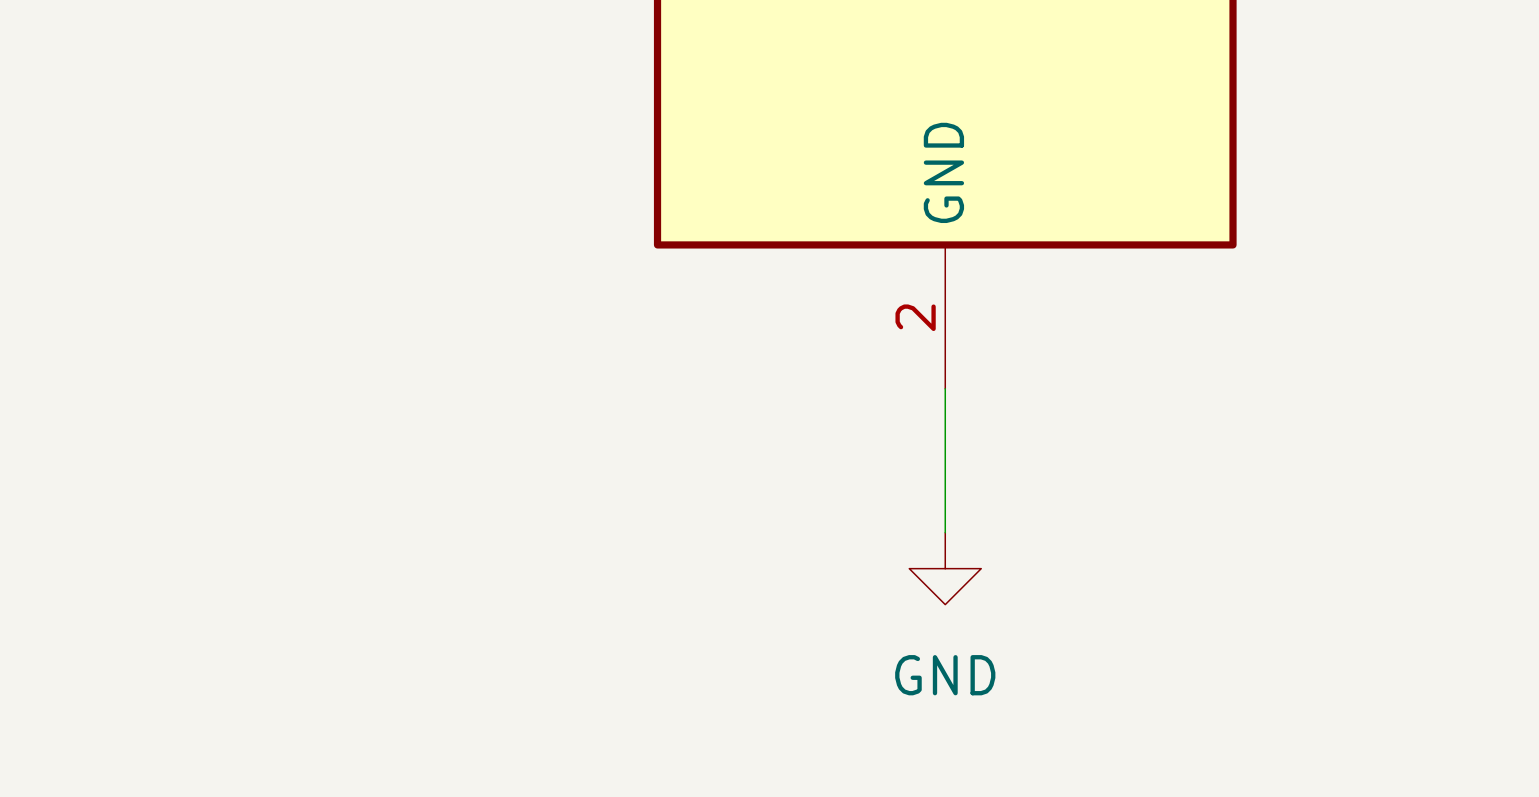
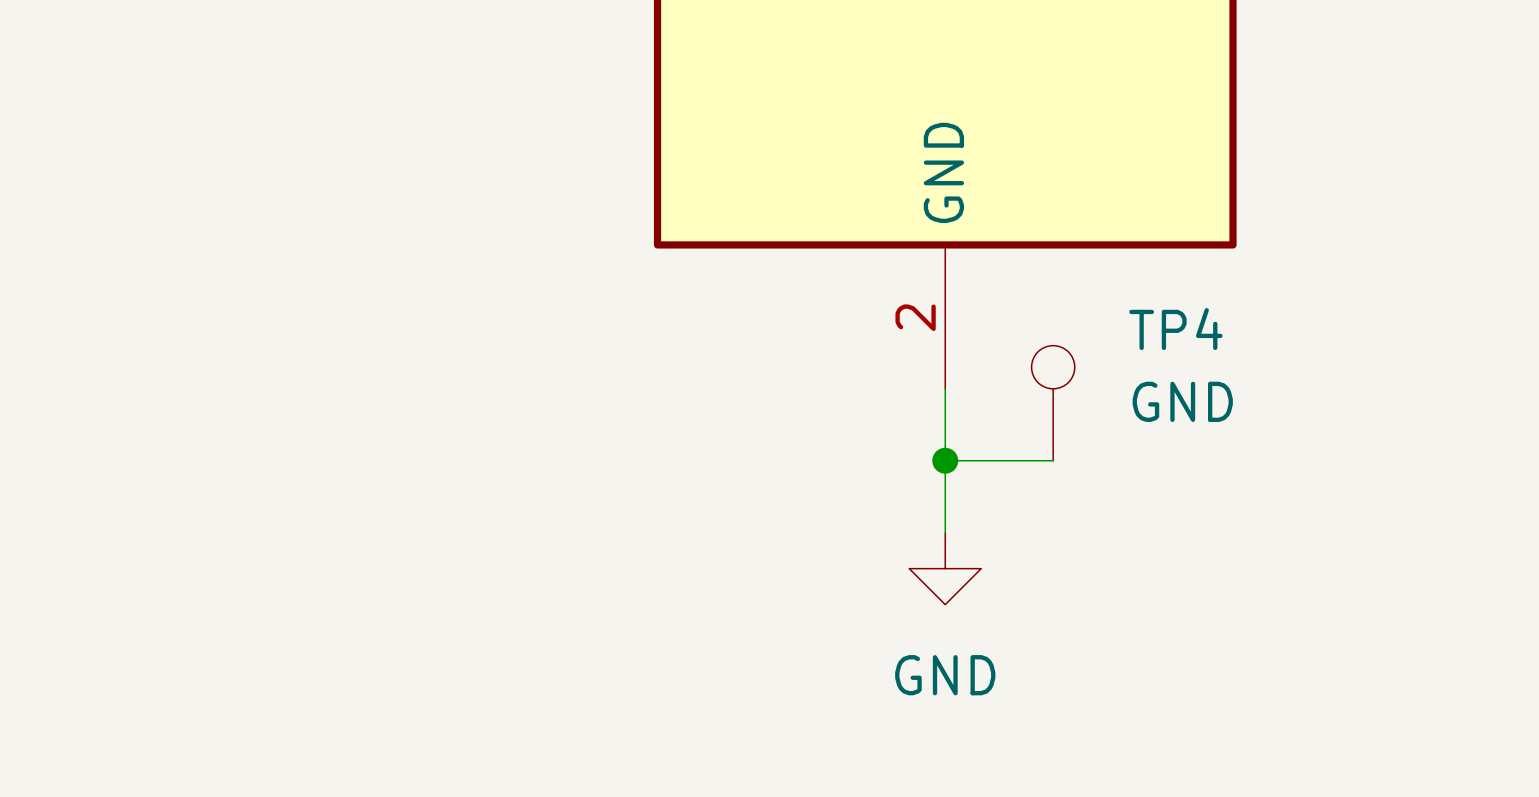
TP4: none -> GND (1053, 403)
wire: none -> (945, 460) (1053, 460)
junction: none -> (945, 460)

